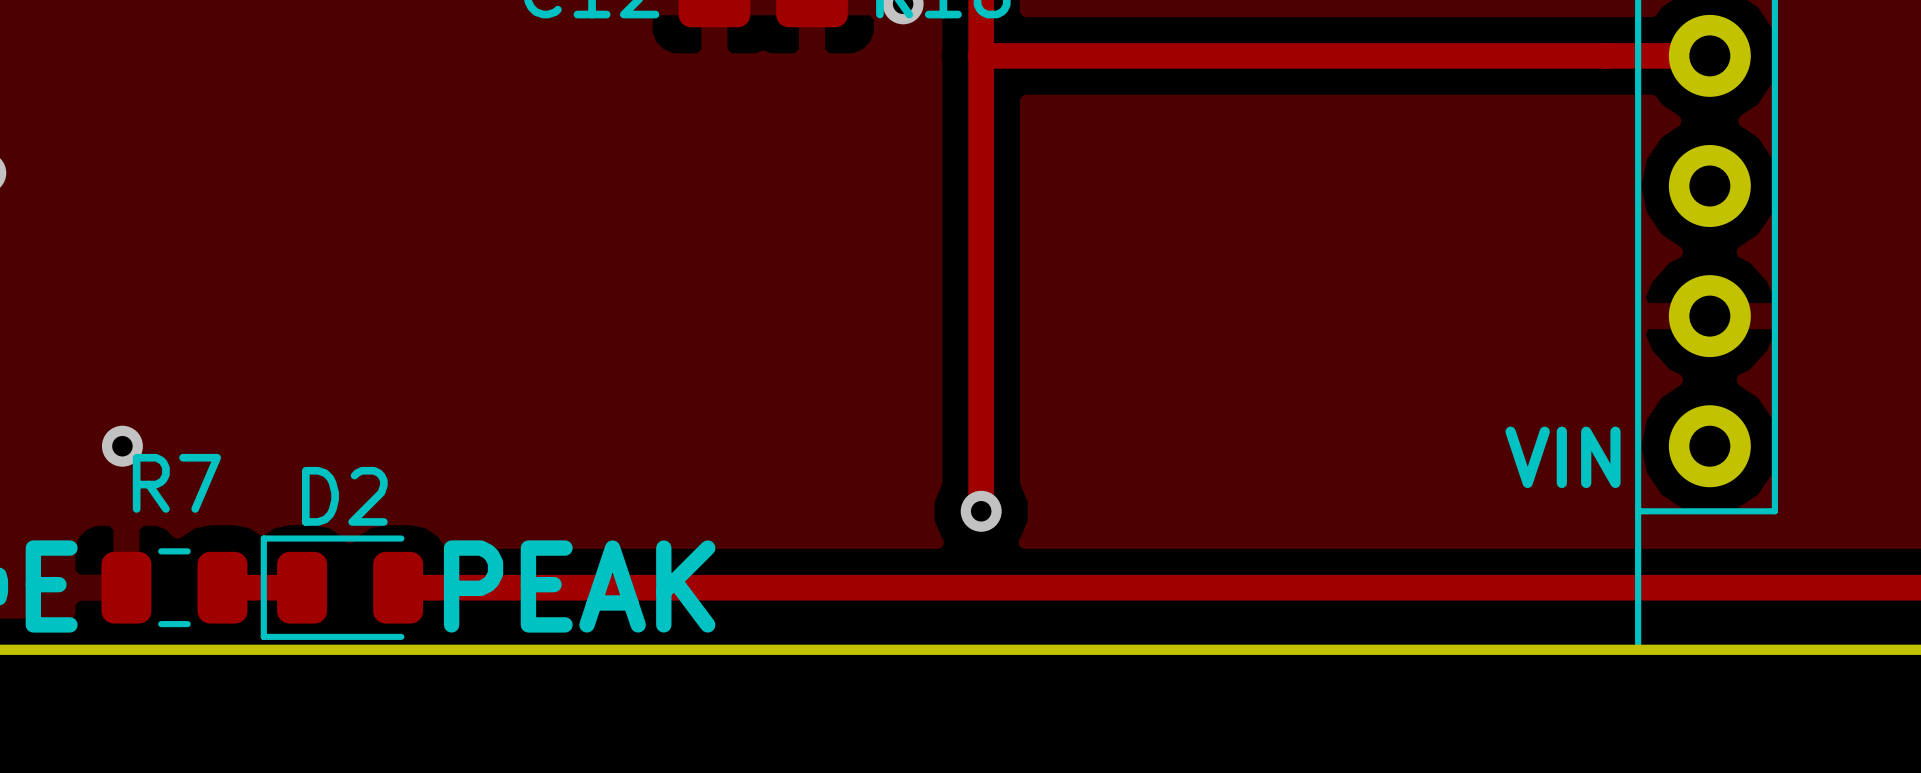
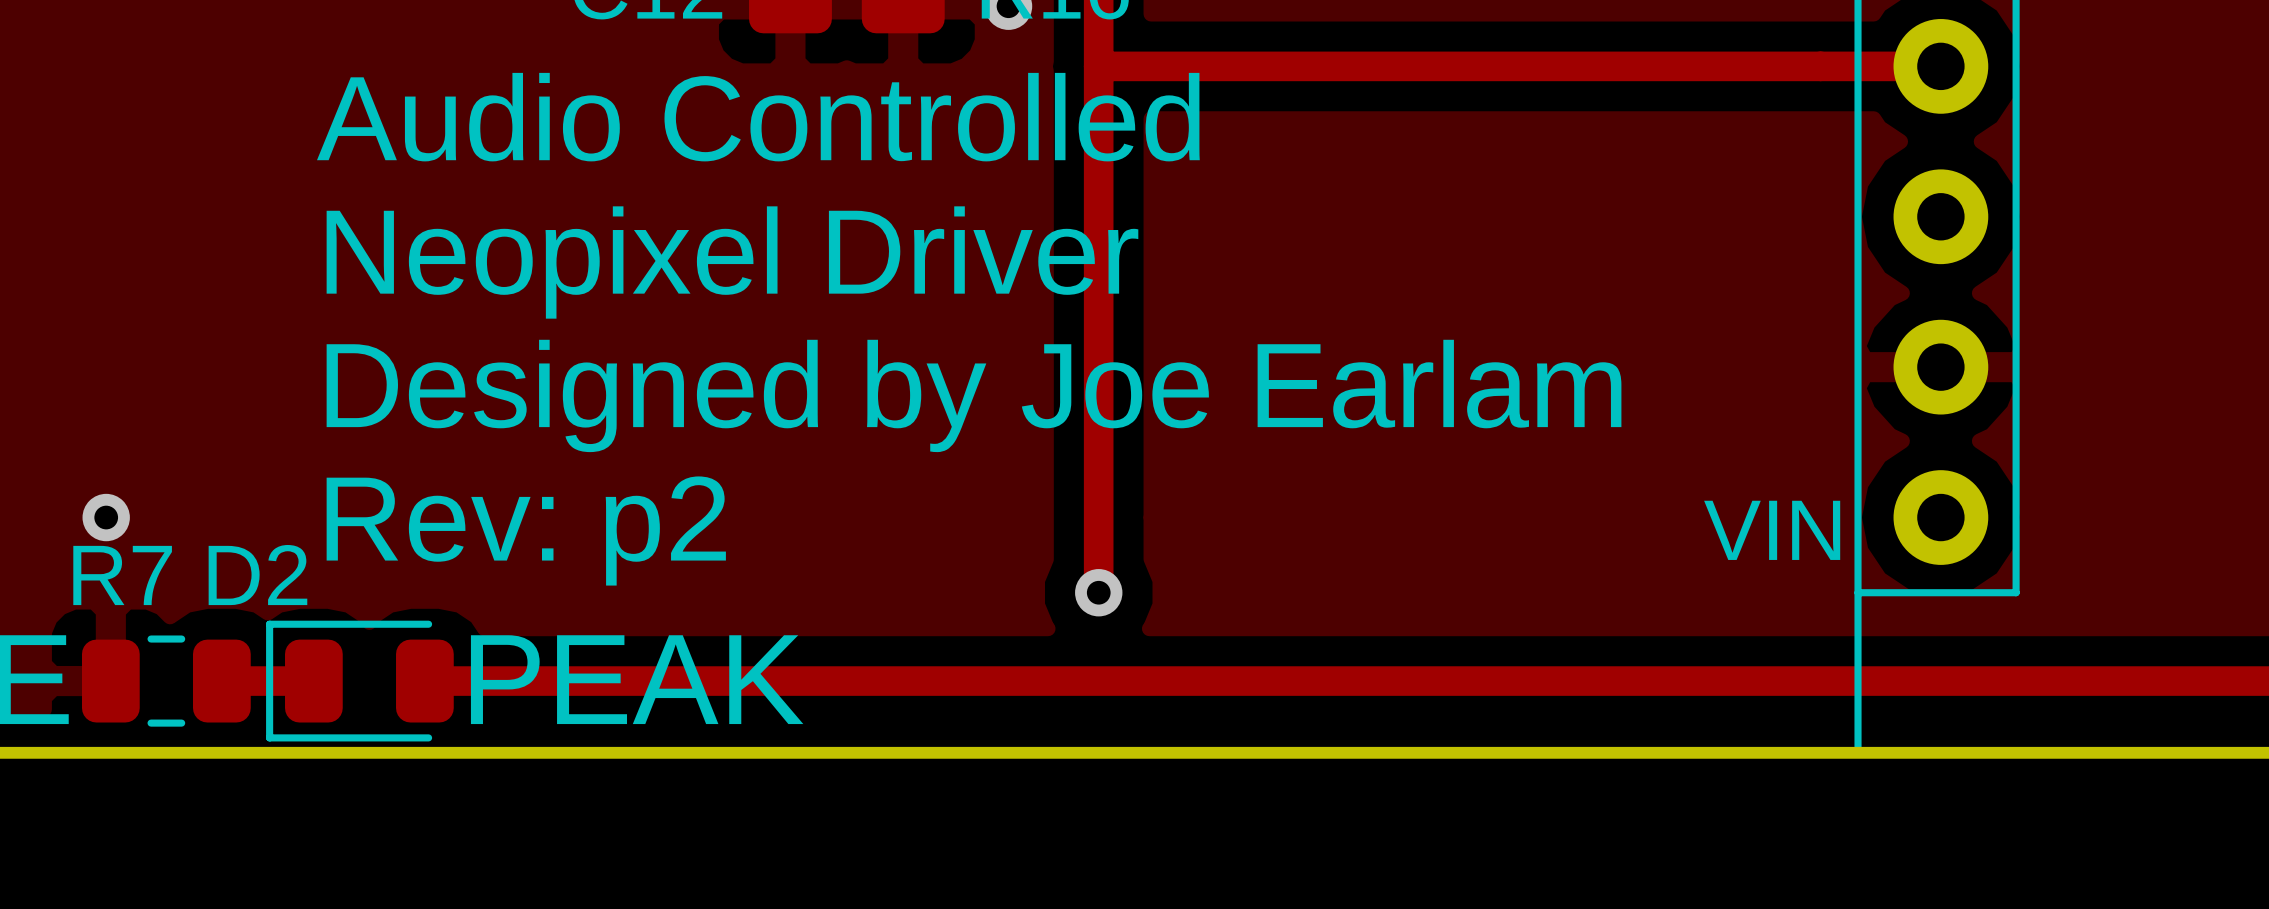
text: none -> Audio Controlled (758, 117)
text: none -> Neopixel Driver (732, 262)
text: none -> Designed by Joe Earlam (974, 395)
text: none -> Rev: p2 (526, 530)
R7 name position: R7 (176, 483) -> R7 (122, 575)
D2 name position: D2 (344, 496) -> D2 (257, 575)

